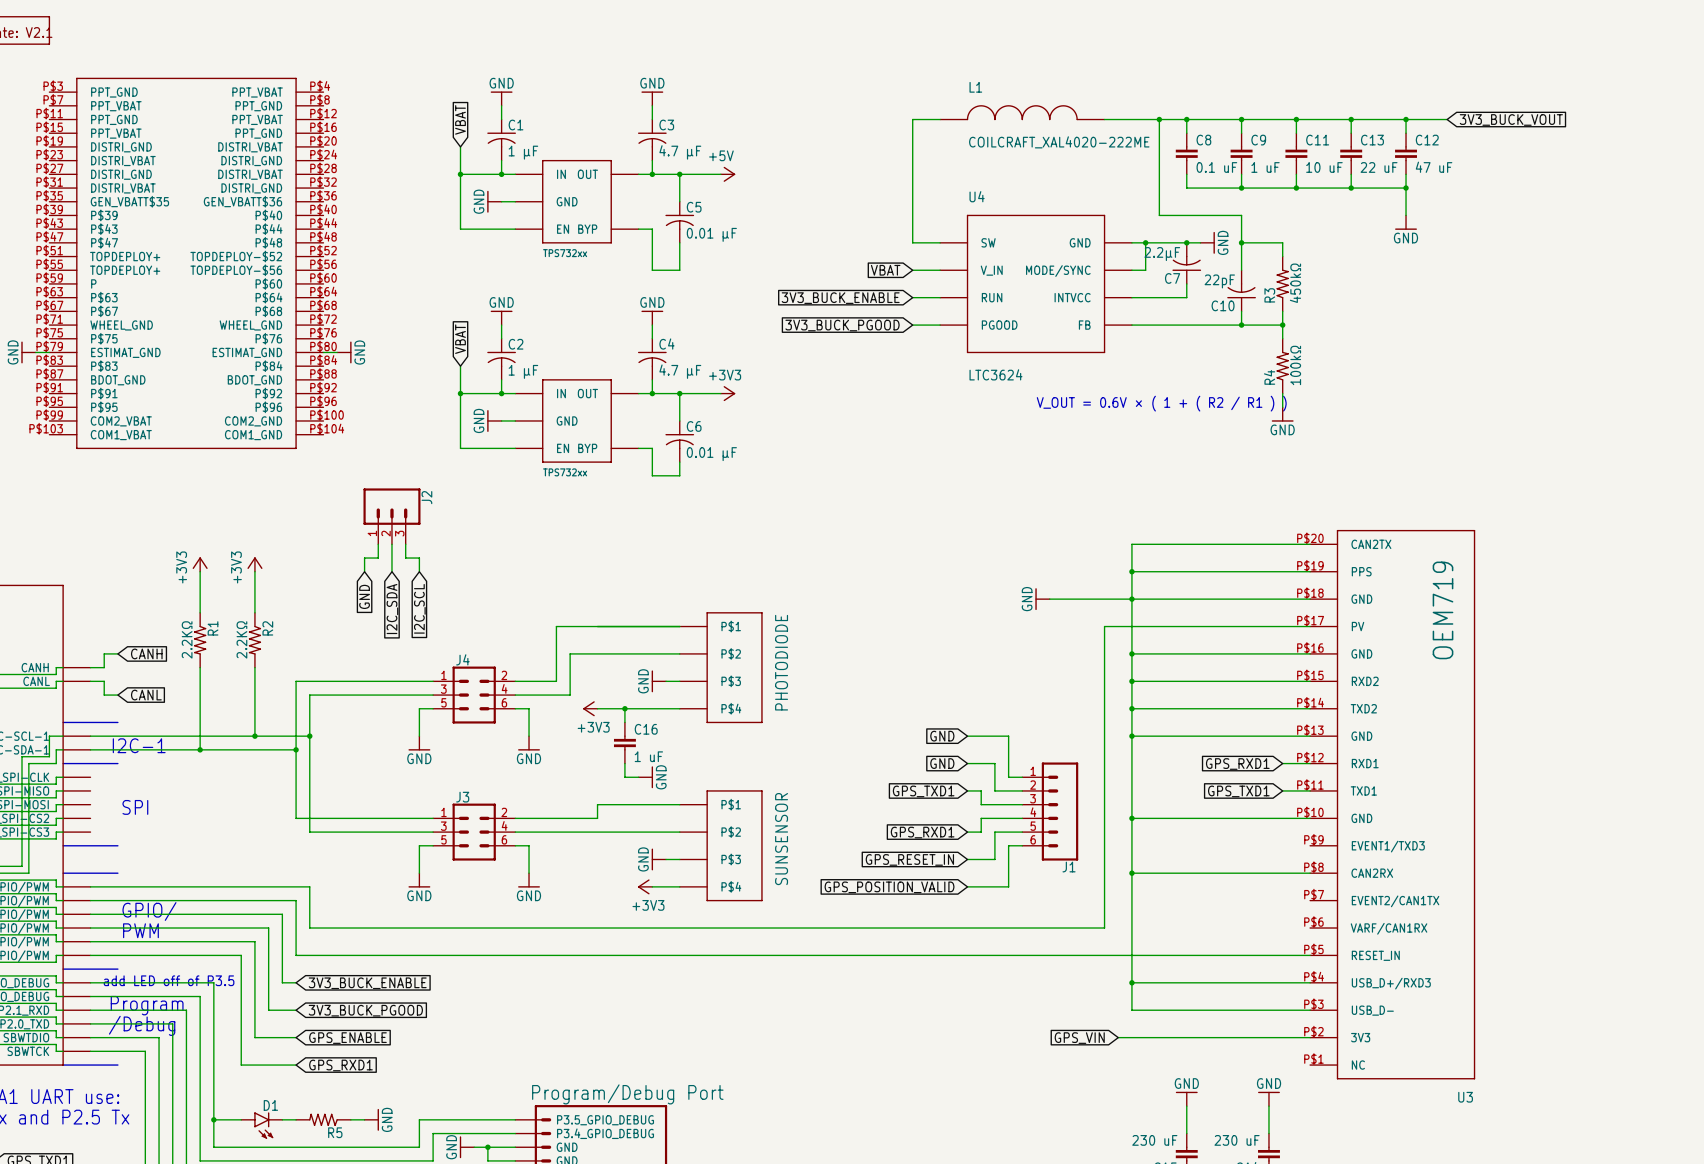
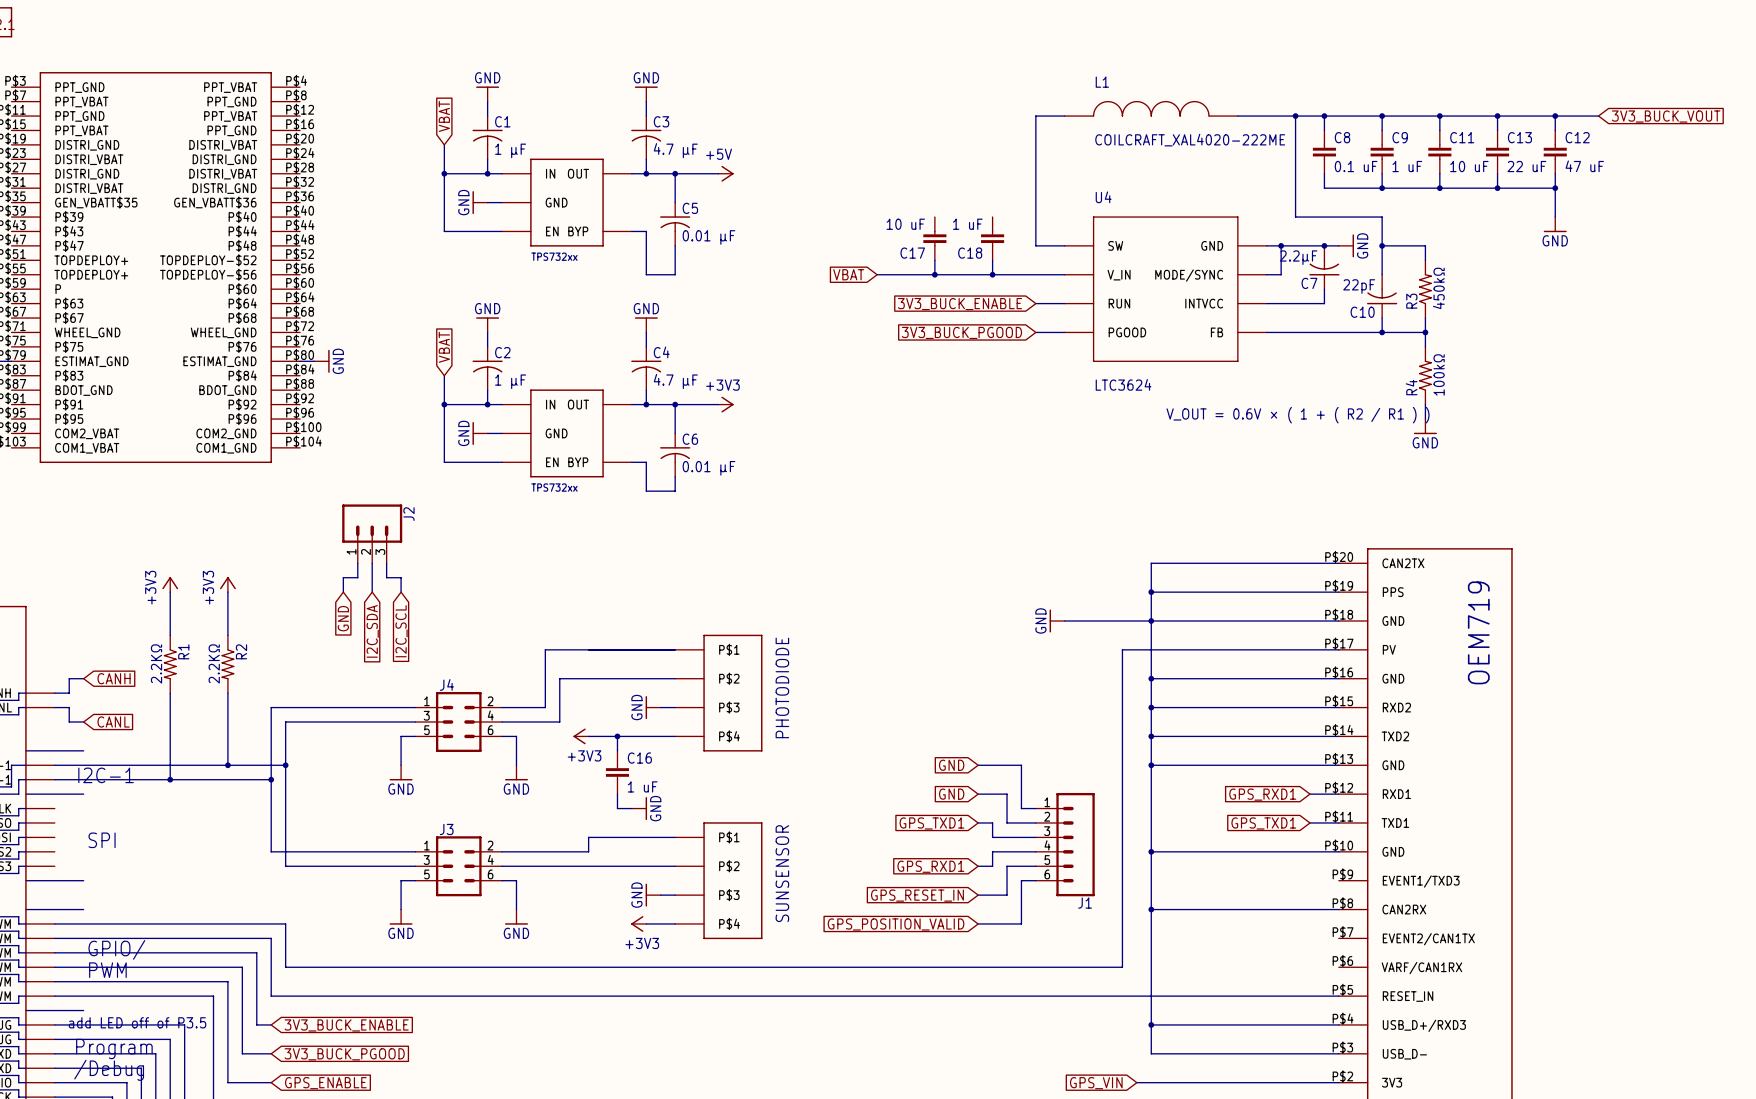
L1 position: (1022, 112) -> (1151, 108)
wire: (940, 119) (912, 119) (912, 242) (940, 242) -> (1064, 116) (1035, 116) (1035, 245) (1064, 245)
wire: (1104, 119) (1214, 119) -> none
wire: (1159, 119) (1159, 215) (1241, 215) (1241, 270) -> (1281, 245) (1281, 274) (1266, 274)
junction: (1159, 119) -> none
wire: (1186, 119) (1186, 133) -> none
junction: (1186, 119) -> none
wire: (1241, 119) (1241, 133) -> none
junction position: (1241, 119) -> (1295, 116)
wire: none -> (1295, 116) (1295, 217) (1382, 217) (1382, 274)
wire: none -> (1483, 116) (1598, 116)
wire: none -> (1497, 116) (1497, 130)
junction: none -> (1497, 116)
global label position: 3V3_BUCK_VOUT (1511, 119) -> 3V3_BUCK_VOUT (1666, 116)
wire: none -> (1555, 116) (1555, 130)
junction: none -> (1555, 116)
C11 name: C11 (1317, 140) -> C8 (1342, 137)
C13 name: C13 (1372, 140) -> C9 (1400, 137)
C12 name: C12 (1427, 140) -> C11 (1462, 137)
C8: 0.1 uF (1186, 153) -> none
C9: 1 uF (1241, 153) -> none
C13: none -> 22 uF (1497, 152)
C12: none -> 47 uF (1555, 152)
C11 value: 10 uF (1324, 167) -> 0.1 uF (1356, 166)
C13 value: 22 uF (1379, 167) -> 1 uF (1407, 166)
C12 value: 47 uF (1434, 167) -> 10 uF (1469, 166)
wire: (1186, 174) (1186, 188) (1296, 188) -> none
wire: (1241, 174) (1241, 188) -> none
wire: none -> (1497, 173) (1497, 188)
wire: none -> (1555, 173) (1555, 217)
junction: (1241, 188) -> none
junction: (1296, 188) -> none
wire: (1406, 188) (1406, 215) -> (1439, 188) (1555, 188)
junction: none -> (1497, 188)
junction: none -> (1555, 188)
power symbol: GND (1406, 222) -> none
power symbol: none -> GND (1555, 224)
C17: none -> 10 uF (934, 238)
C18: none -> 1 uF (992, 238)
wire: (1131, 242) (1200, 242) -> none
wire: (1145, 242) (1145, 270) (1131, 270) -> none
junction: (1145, 242) -> none
junction: (1186, 242) -> none
power symbol: GND (1207, 242) -> none
junction position: (1241, 242) -> (1281, 245)
wire: (1282, 242) (1282, 256) -> (1309, 245) (1338, 245)
junction: none -> (1324, 245)
power symbol: none -> GND (1346, 245)
wire: none -> (1382, 245) (1425, 245) (1425, 260)
junction: none -> (1382, 245)
wire: none -> (934, 260) (934, 274)
wire: none -> (992, 260) (992, 274)
C7 position: (1186, 263) -> (1324, 267)
wire: none -> (877, 274) (920, 274)
global label position: VBAT (885, 270) -> VBAT (848, 274)
junction: none -> (934, 274)
wire: none -> (949, 274) (1064, 274)
junction: none -> (992, 274)
U4 position: (1036, 283) -> (1165, 289)
wire: (1186, 283) (1186, 297) (1131, 297) -> (1324, 289) (1324, 303) (1266, 303)
R3 position: (1282, 283) -> (1425, 289)
C10 position: (1241, 290) -> (1382, 296)
wire: (912, 297) (940, 297) -> (1035, 303) (1064, 303)
global label position: 3V3_BUCK_ENABLE (840, 298) -> 3V3_BUCK_ENABLE (960, 304)
wire: (1241, 311) (1241, 325) (1131, 325) -> none
wire: (1282, 311) (1282, 338) -> (1425, 318) (1425, 346)
wire: none -> (1382, 318) (1382, 332)
global label position: 3V3_BUCK_PGOOD (842, 325) -> 3V3_BUCK_PGOOD (961, 332)
wire: (912, 325) (940, 325) -> (1035, 332) (1064, 332)
junction: (1241, 325) -> none
wire: none -> (1309, 332) (1425, 332)
junction: (1282, 325) -> none
junction: none -> (1382, 332)
junction: none -> (1425, 332)
R4 position: (1282, 366) -> (1425, 375)
wire: (1282, 393) (1282, 407) -> (1425, 404) (1425, 419)
text position: V_OUT = 0.6V × ( 1 + ( R2 / R1 ) ) (1161, 403) -> V_OUT = 0.6V × ( 1 + ( R2 / R1 ) ) (1298, 415)
power symbol: GND (1282, 414) -> none
power symbol: none -> GND (1425, 426)

